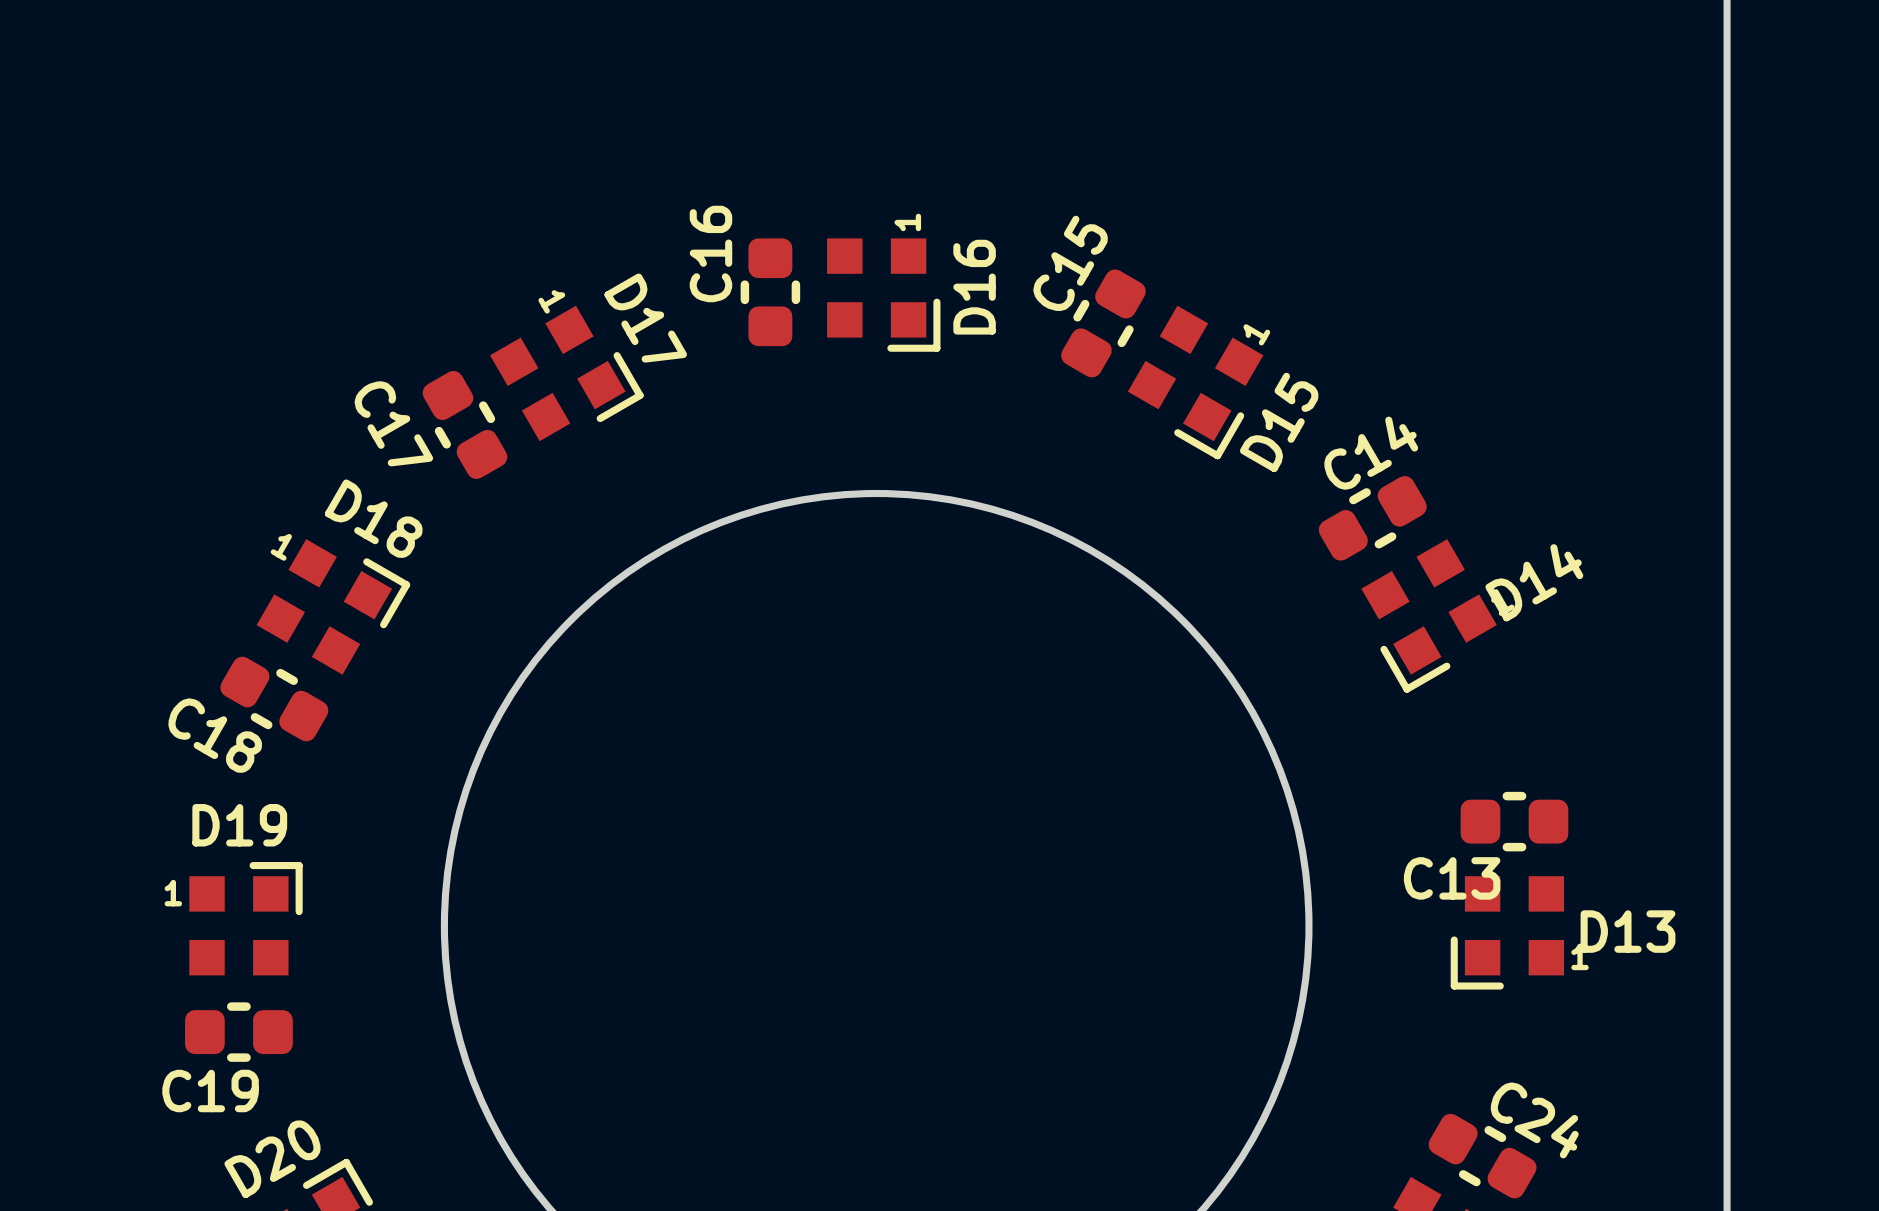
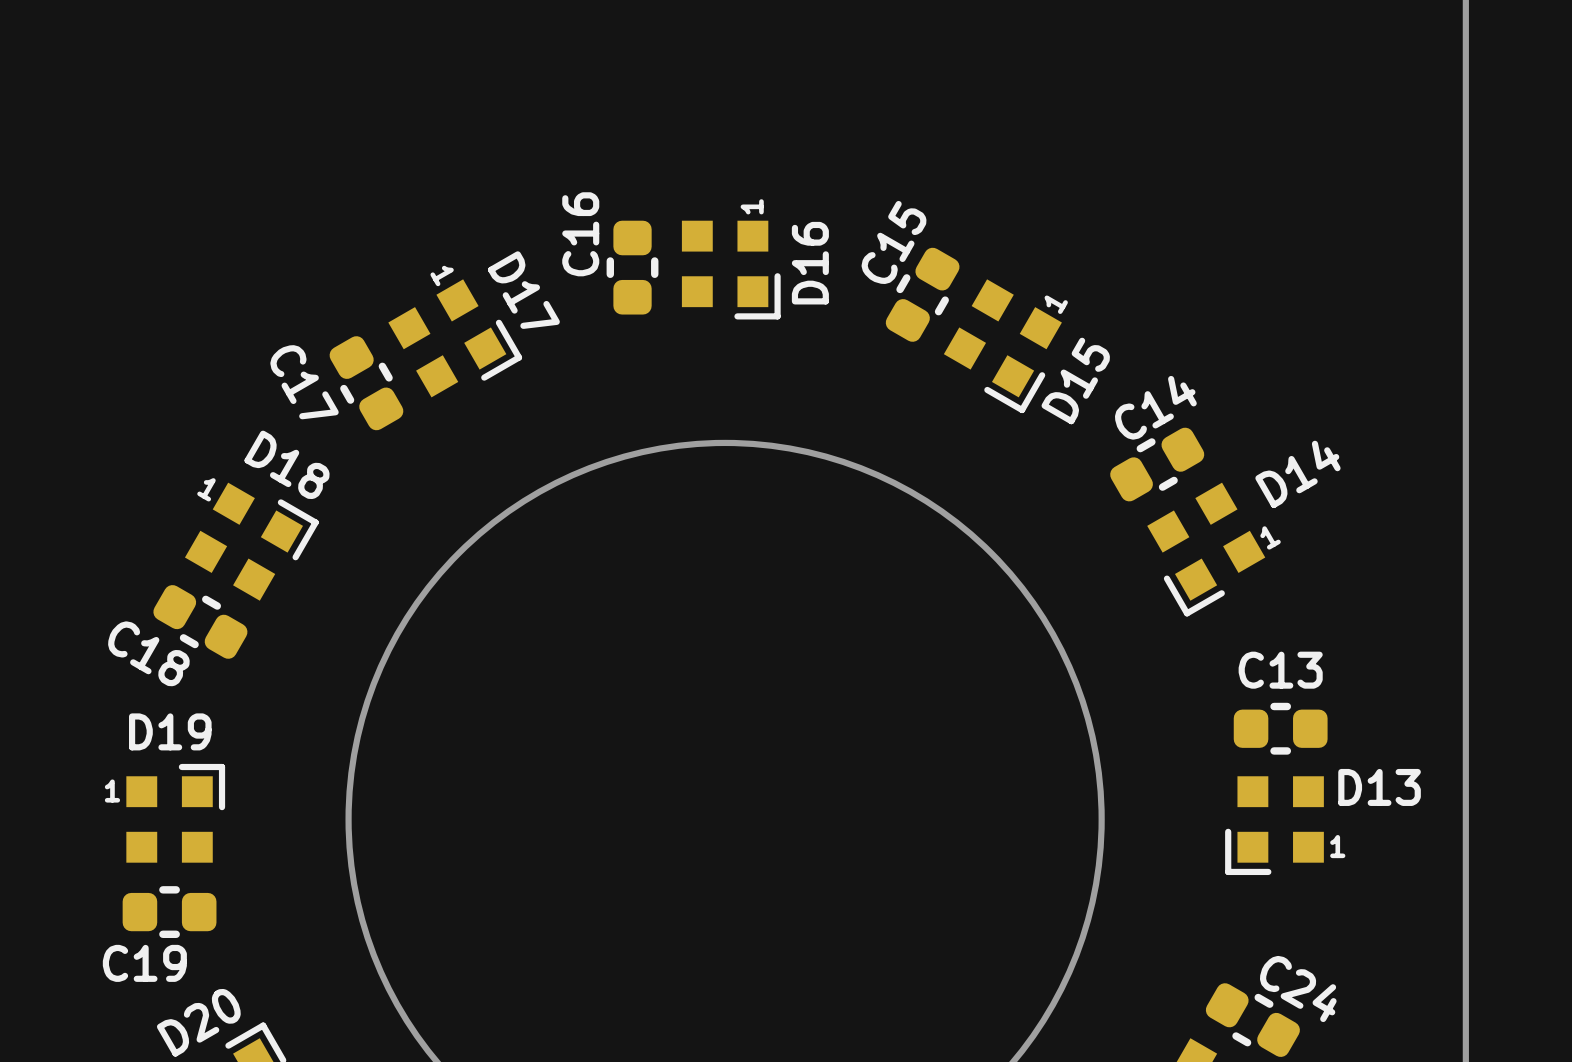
D14 name position: D14 (1534, 582) -> D14 (1297, 474)
C13 name position: C13 (1452, 878) -> C13 (1280, 670)
D13 name position: D13 (1628, 931) -> D13 (1379, 787)

